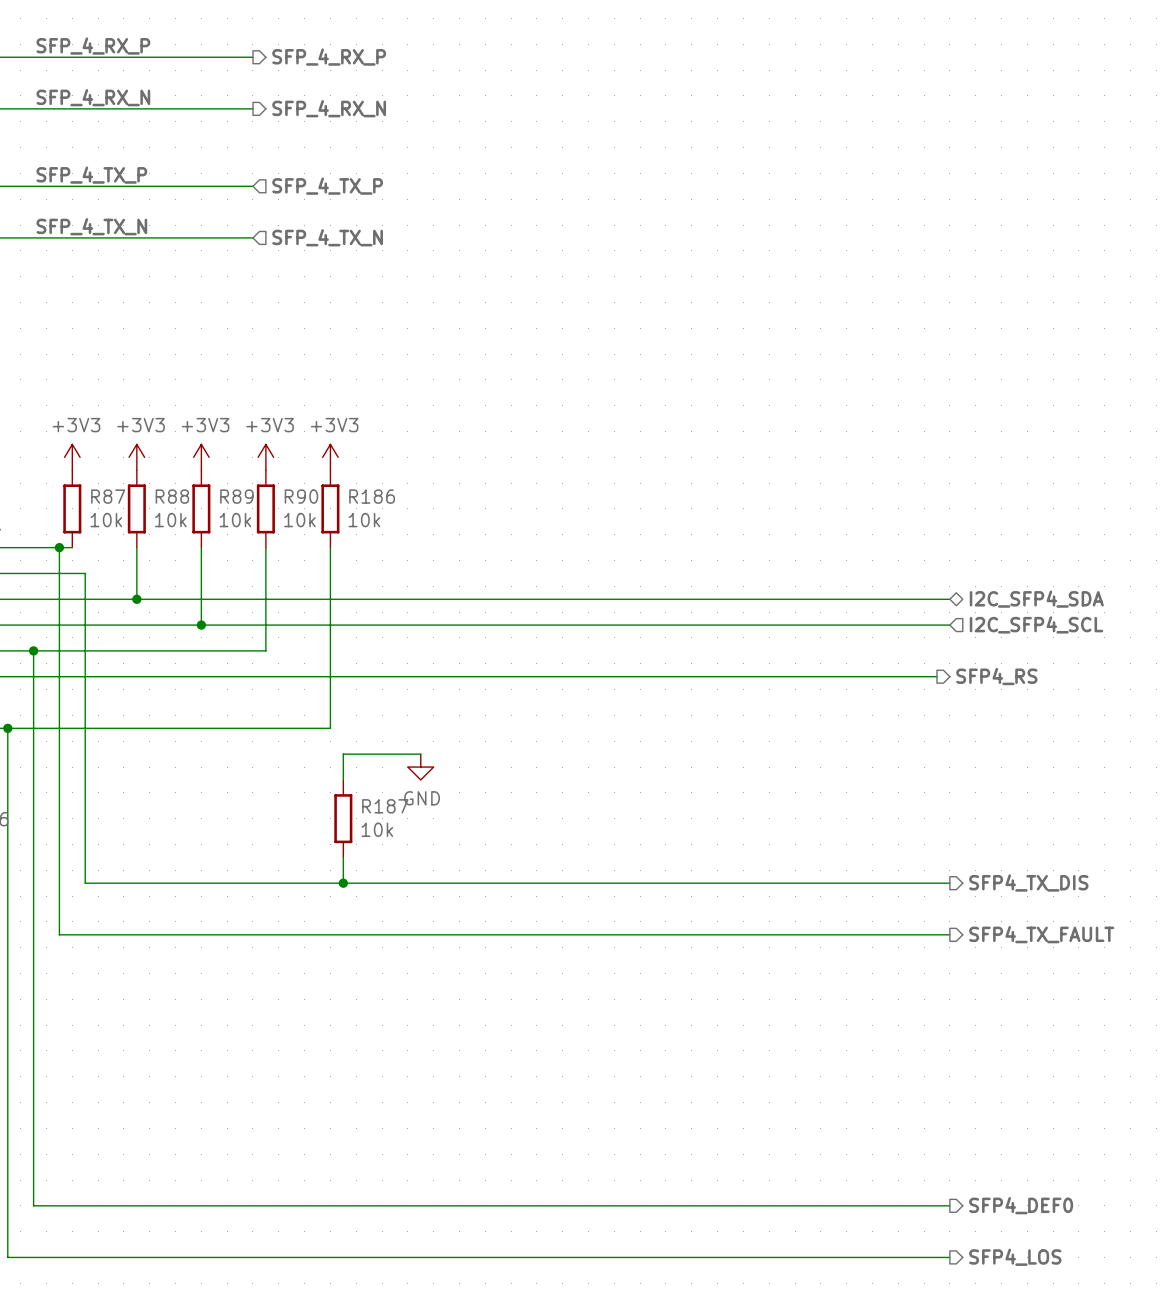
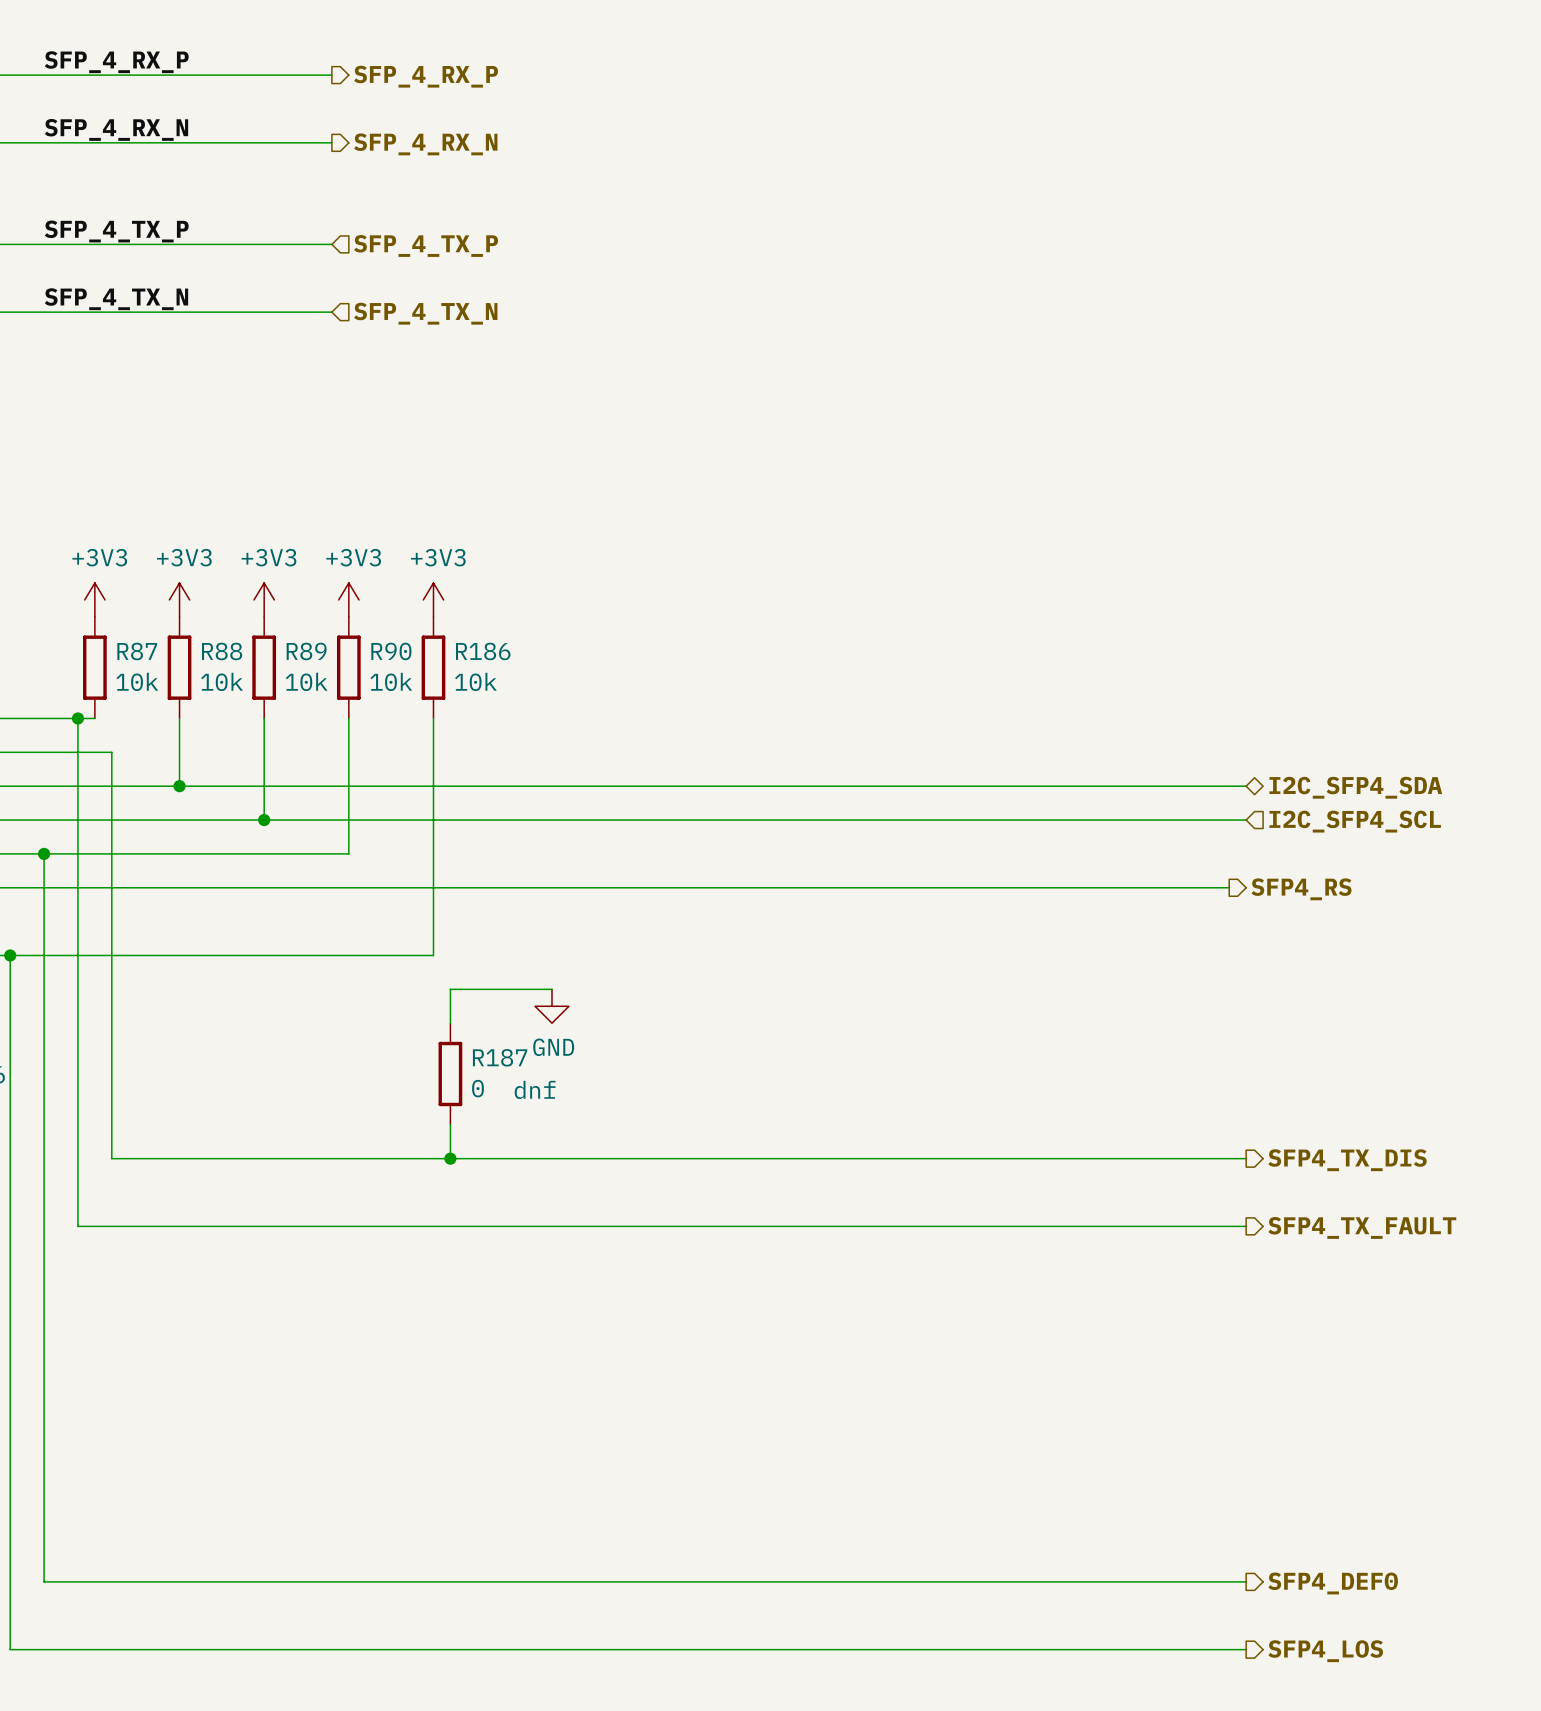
R187 text: none -> 0 (478, 1088)
R187 text: 10k (377, 829) -> none
R187 text: none -> dnf (535, 1089)

